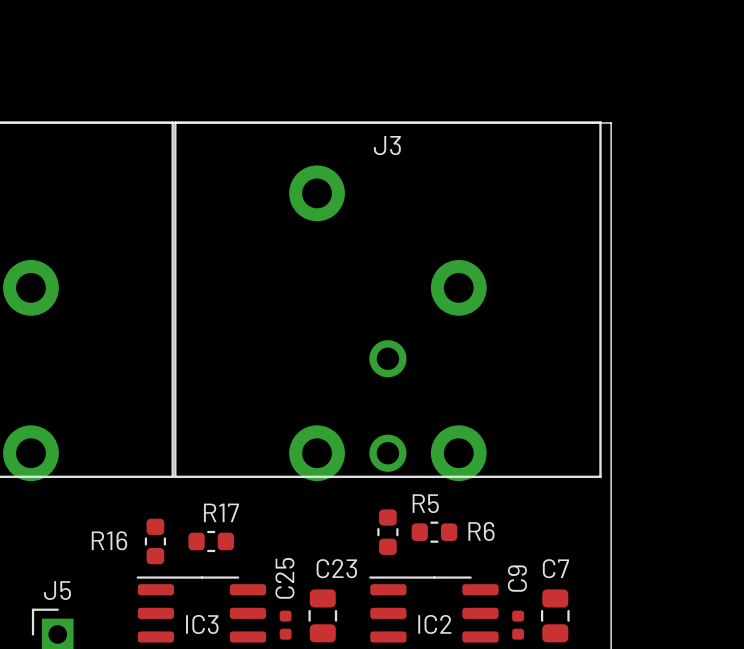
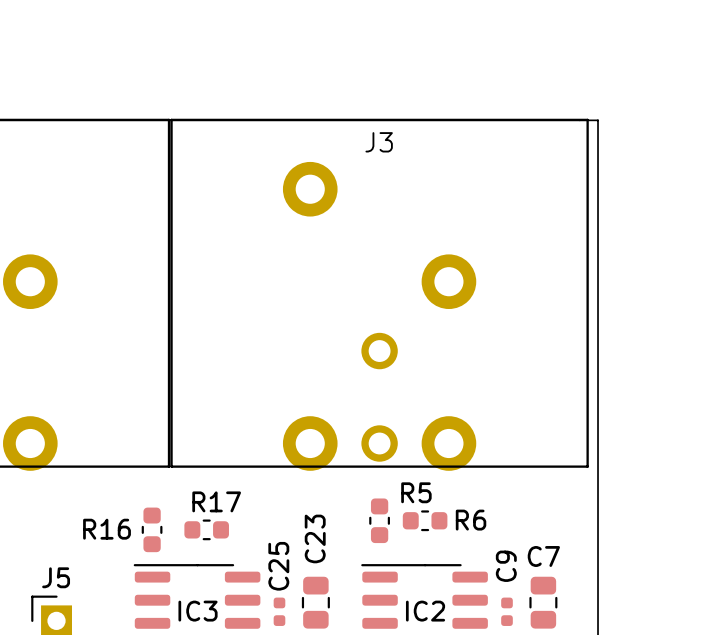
C23 name rotation: 0° (336, 568) -> 90° counterclockwise (315, 538)

